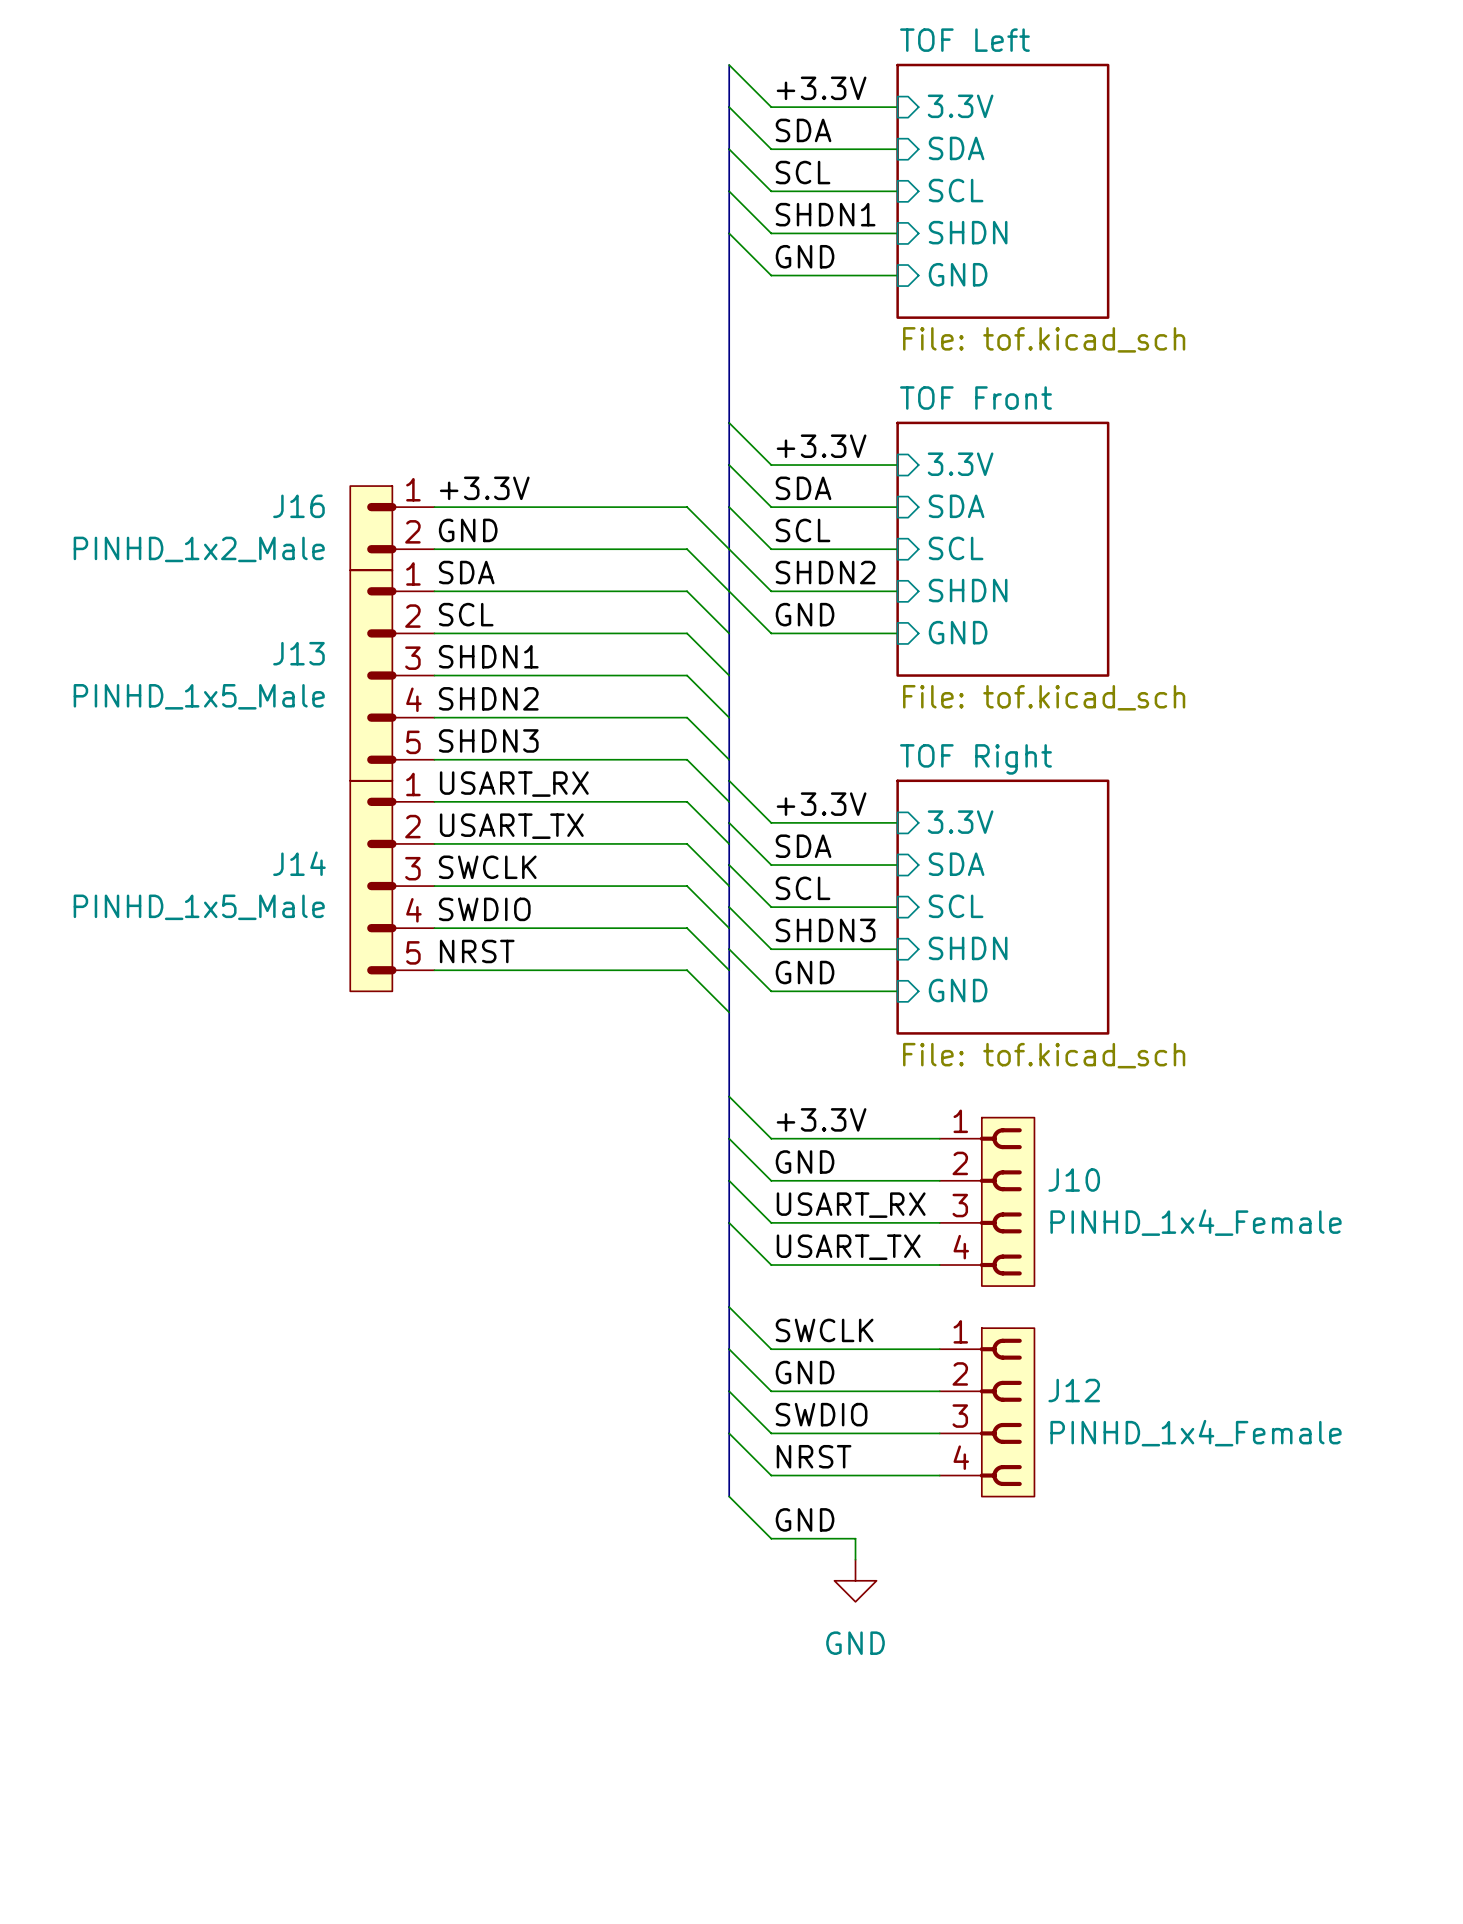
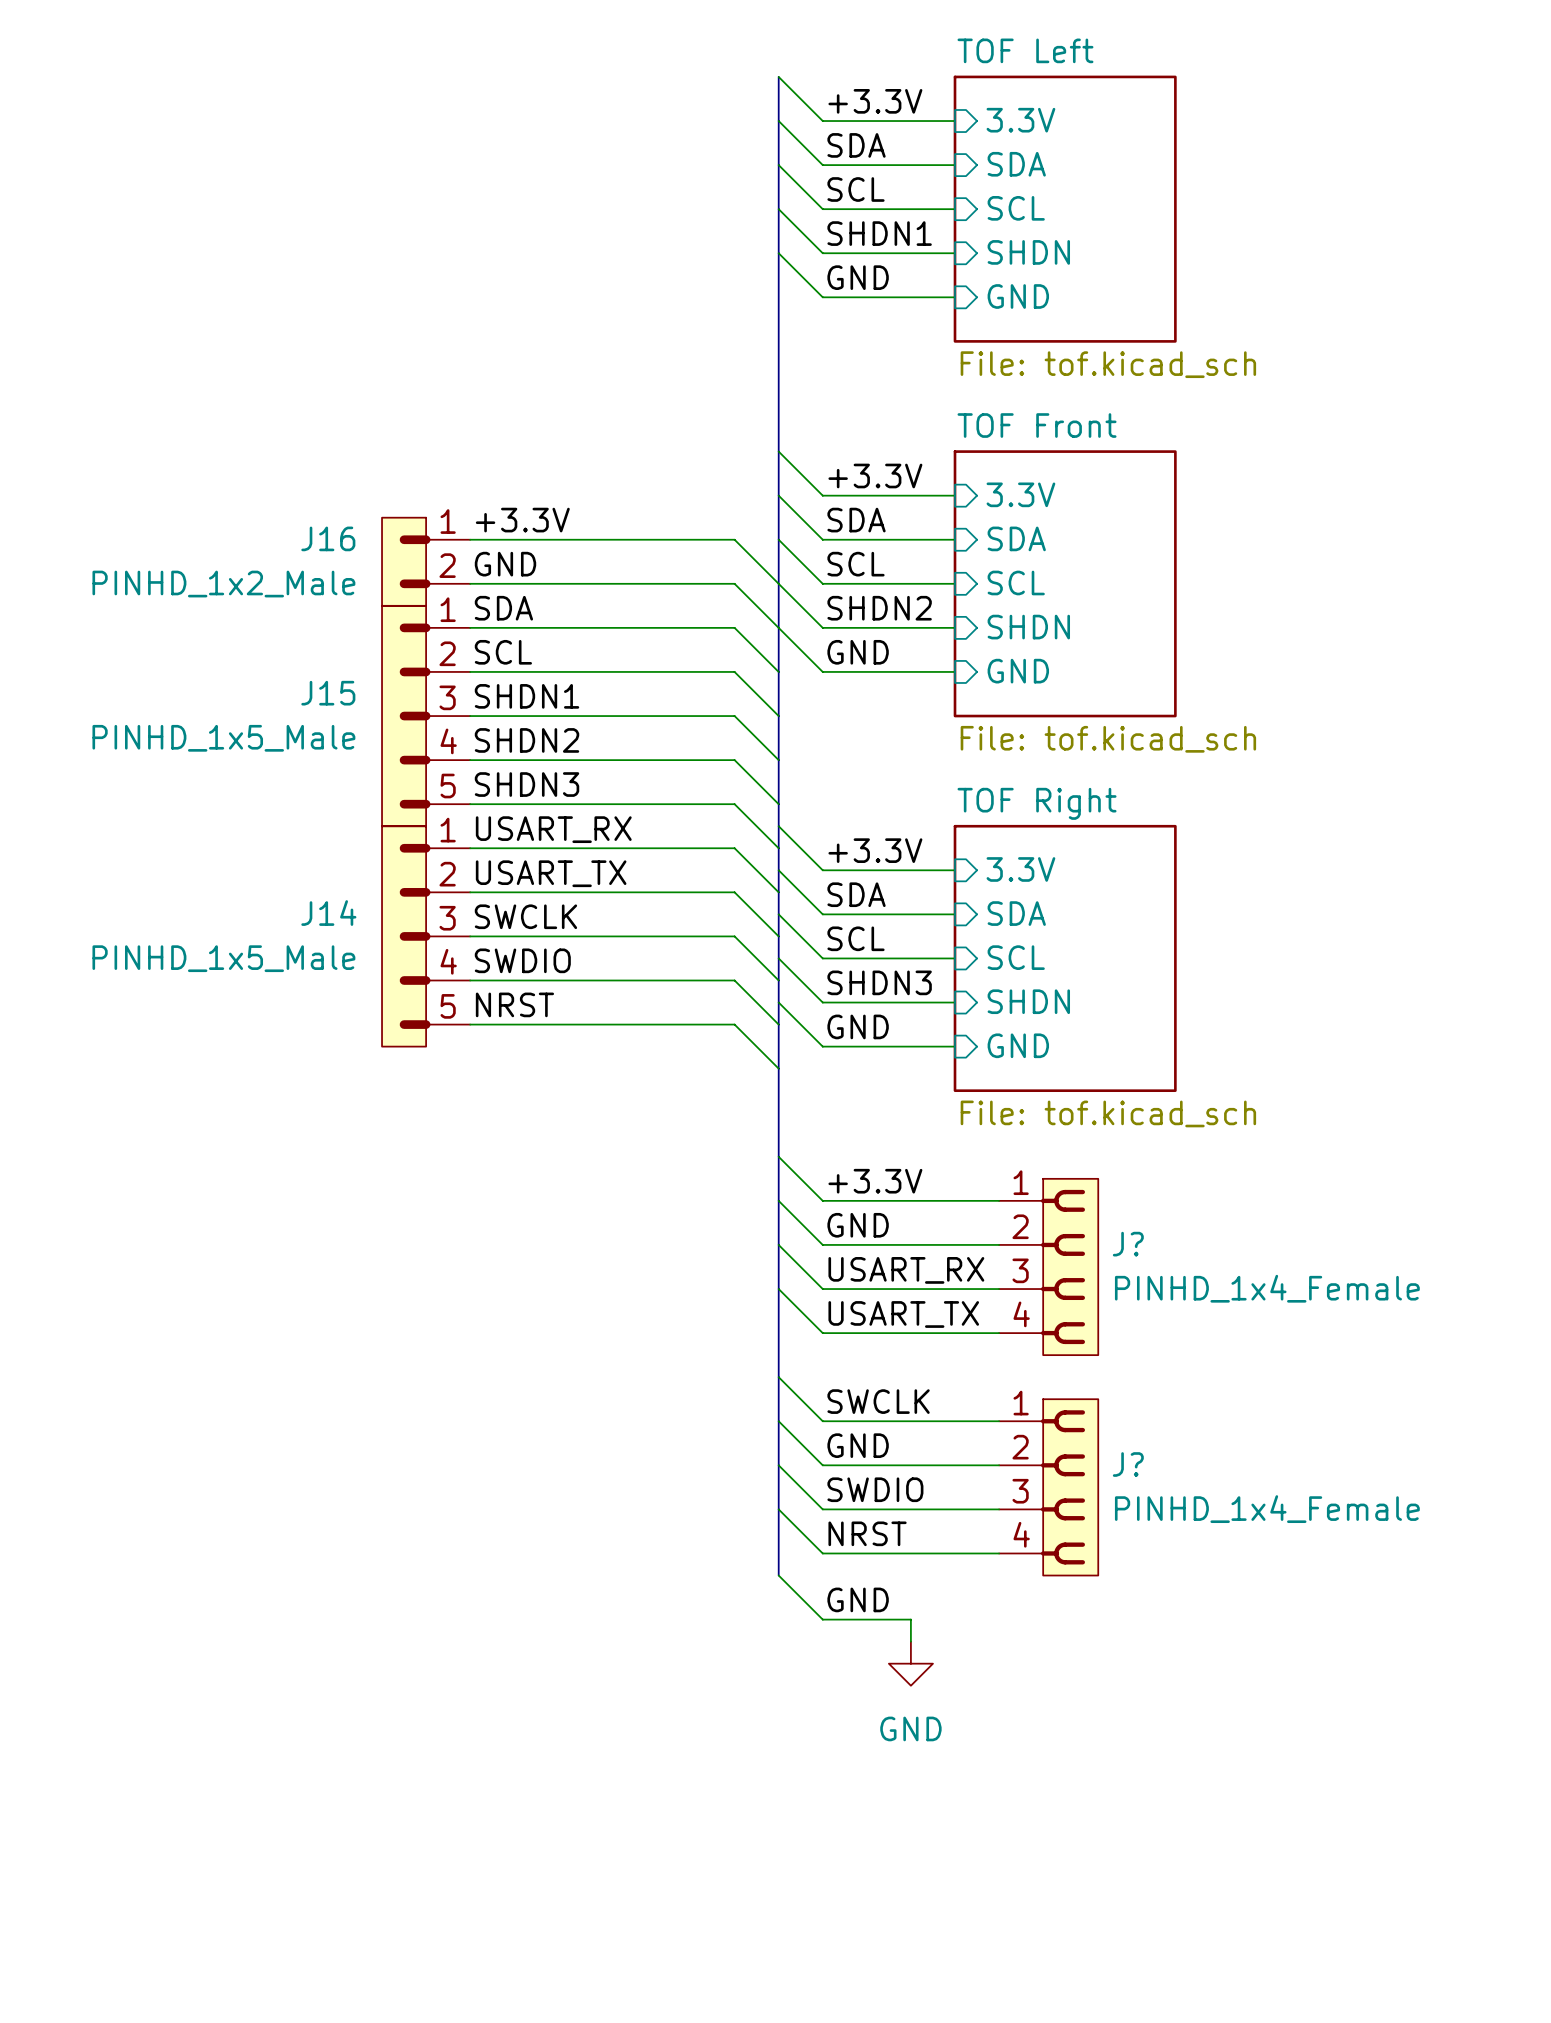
J13 name: J13 (298, 653) -> J15 (328, 693)
J10 name: J10 (1074, 1180) -> J? (1128, 1244)
J12 name: J12 (1074, 1390) -> J? (1128, 1464)

